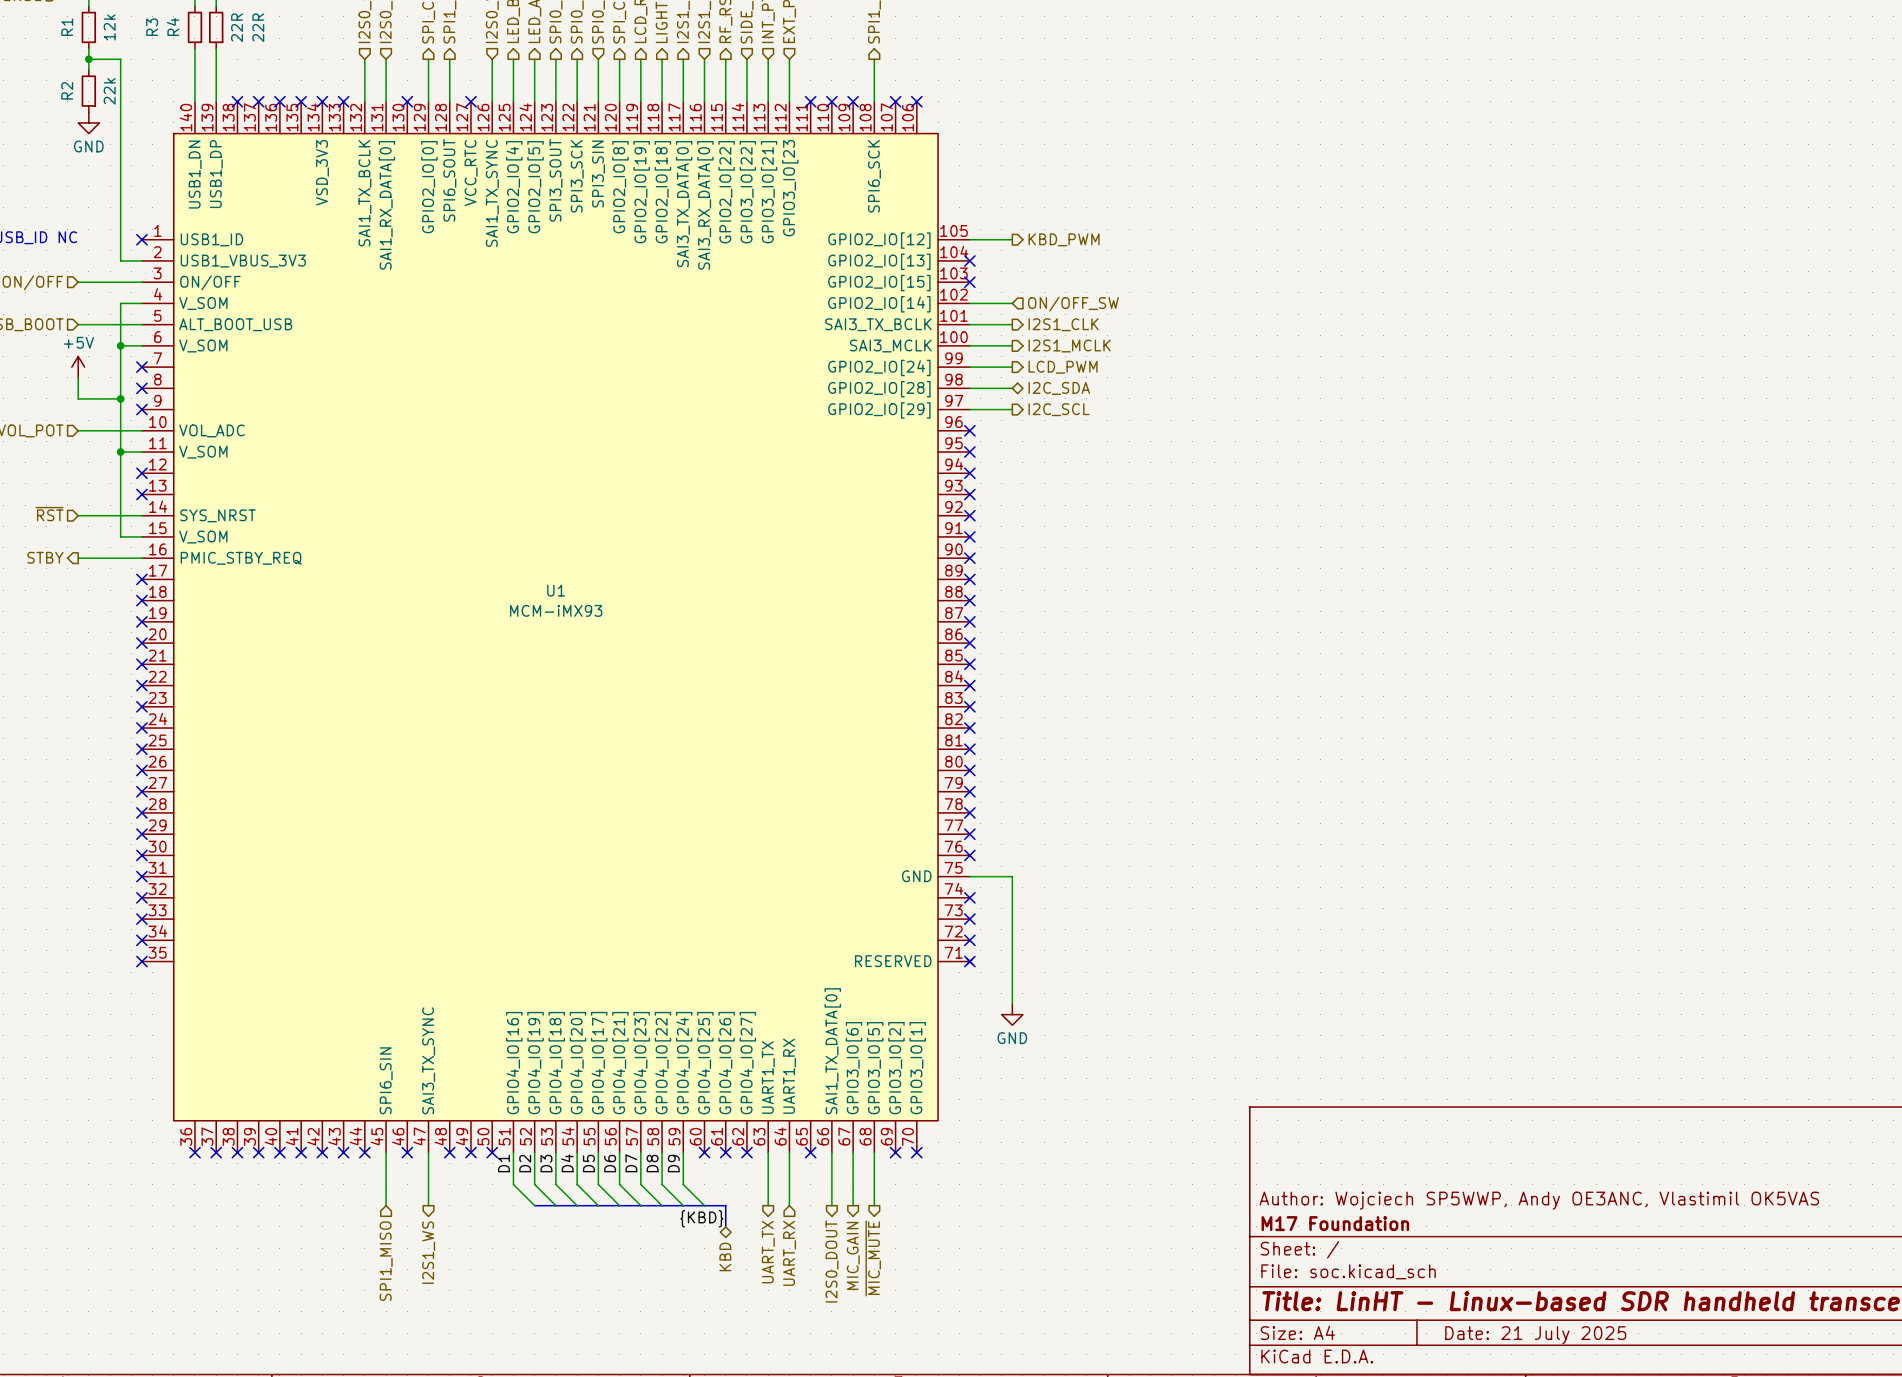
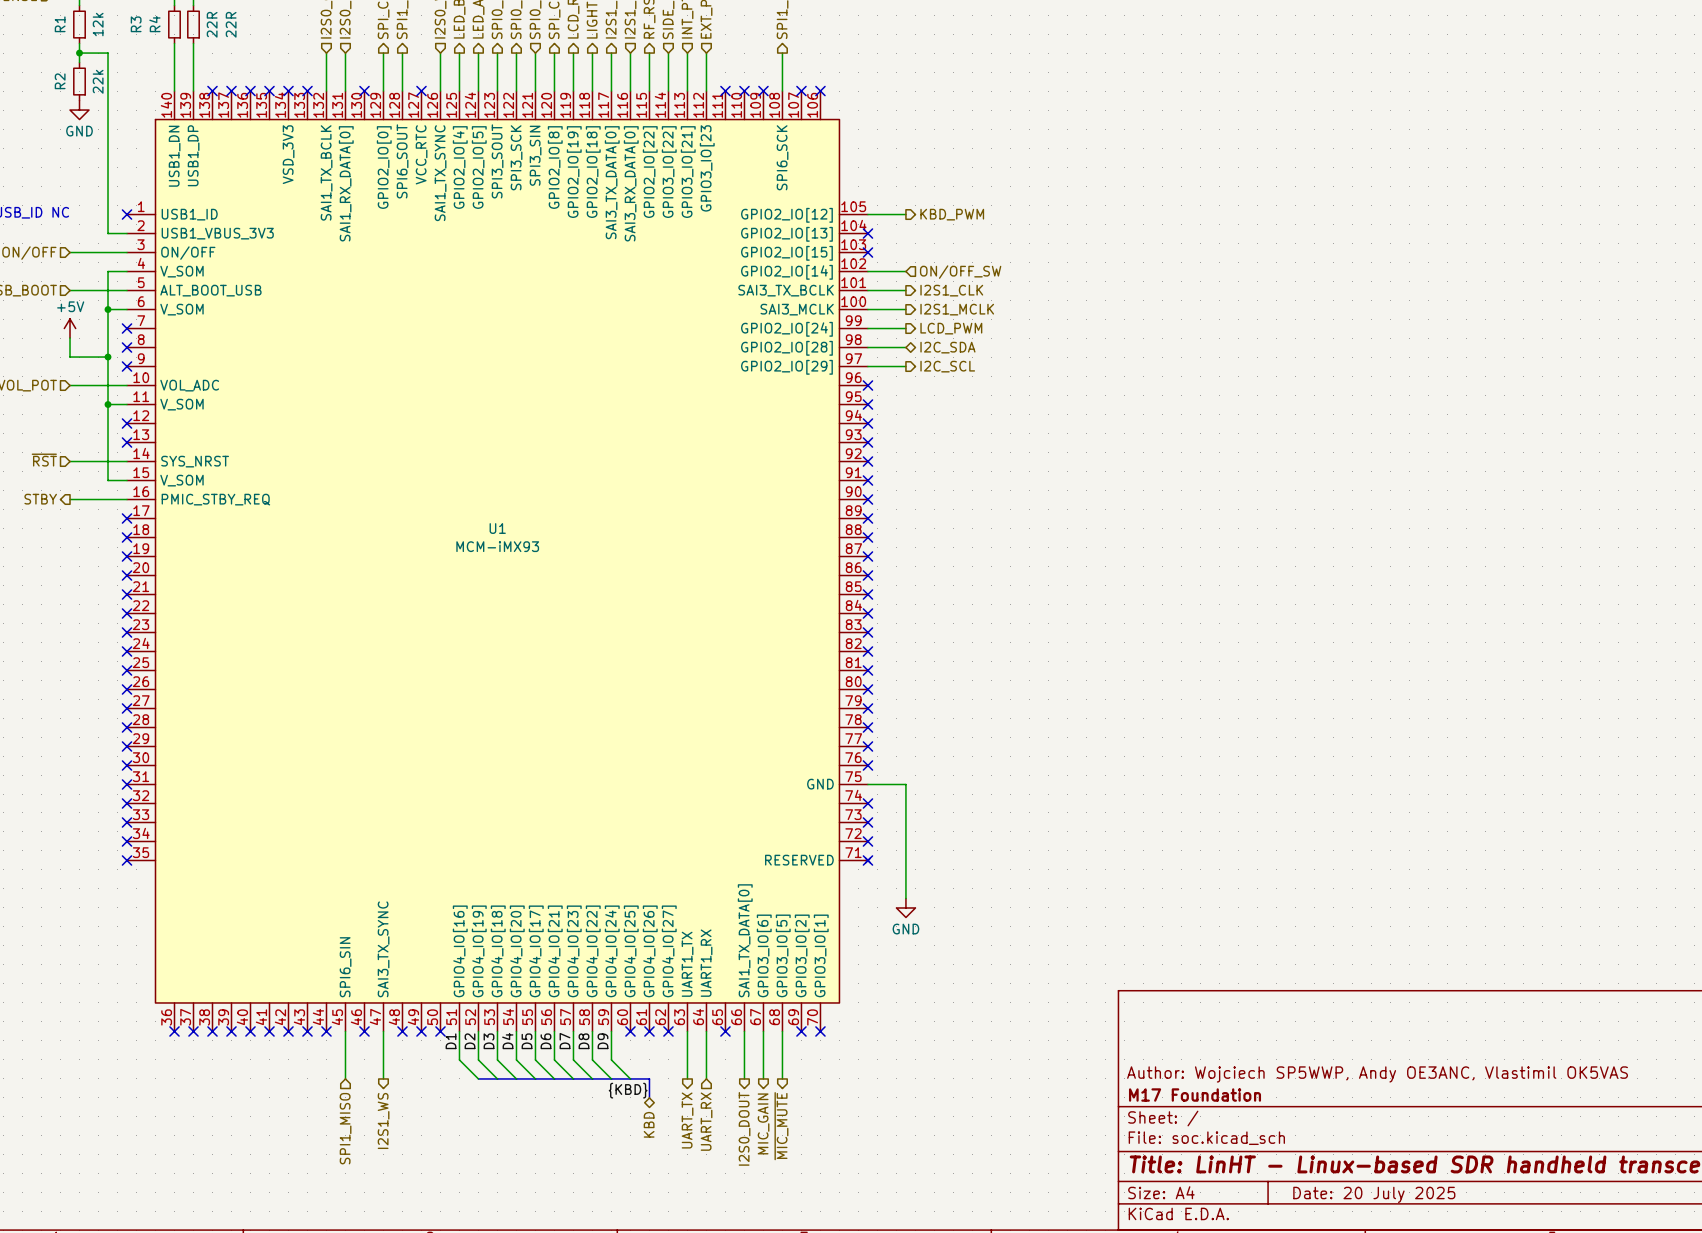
title block: Date: 21 July 2025 (1535, 1335) -> Date: 20 July 2025 (1374, 1194)

